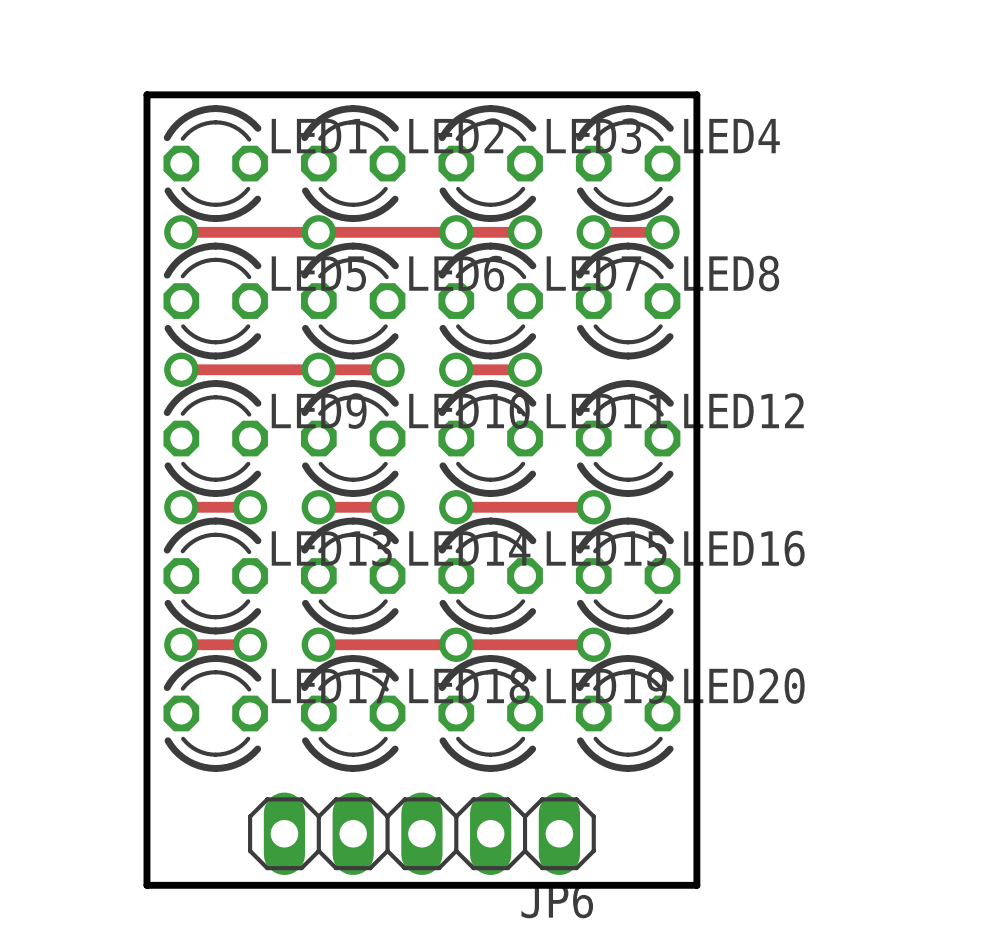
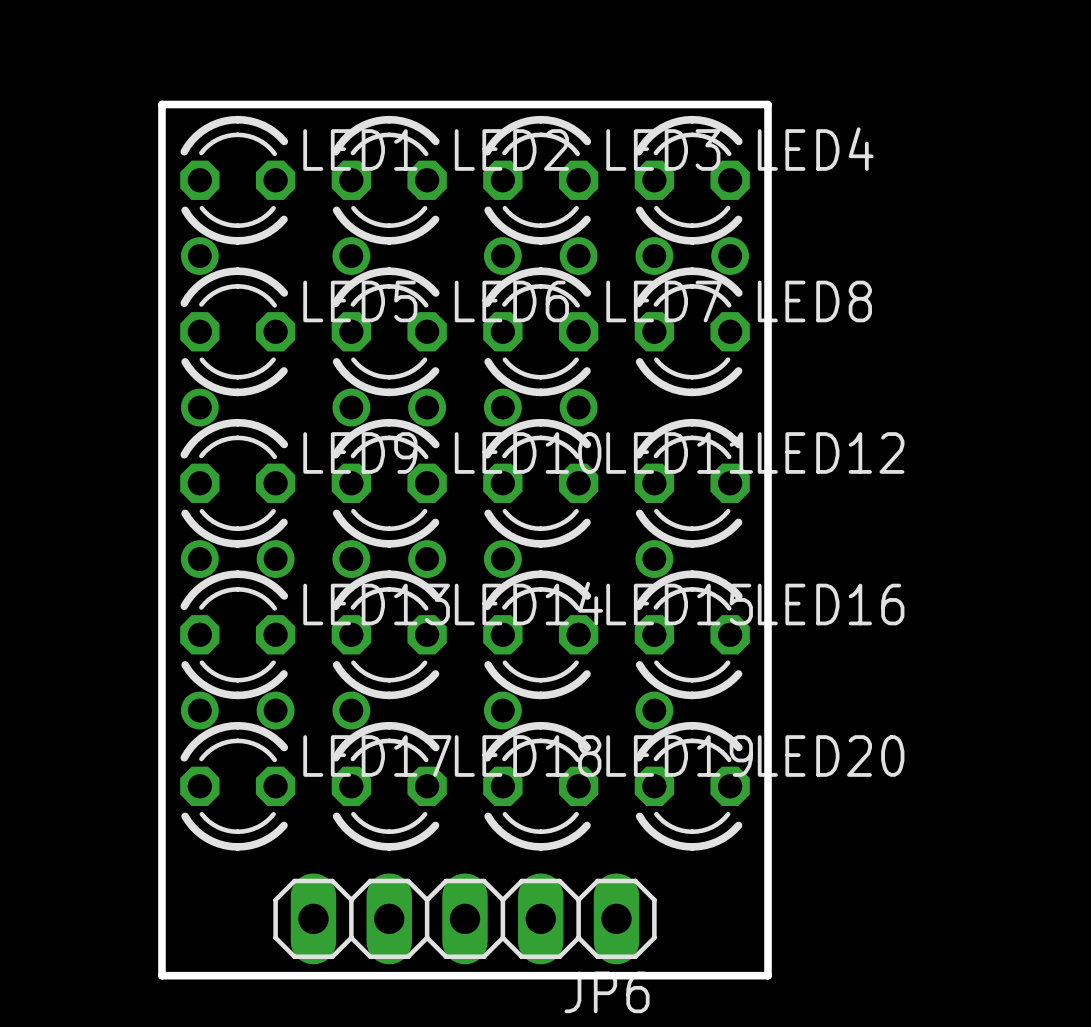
track: (181, 232) (525, 232) -> none
track: (593, 232) (662, 232) -> none
track: (181, 369) (387, 369) -> none
track: (456, 369) (525, 369) -> none
track: (181, 507) (250, 507) -> none
track: (318, 507) (387, 507) -> none
track: (456, 507) (593, 507) -> none
track: (181, 644) (250, 644) -> none
track: (318, 644) (593, 644) -> none

